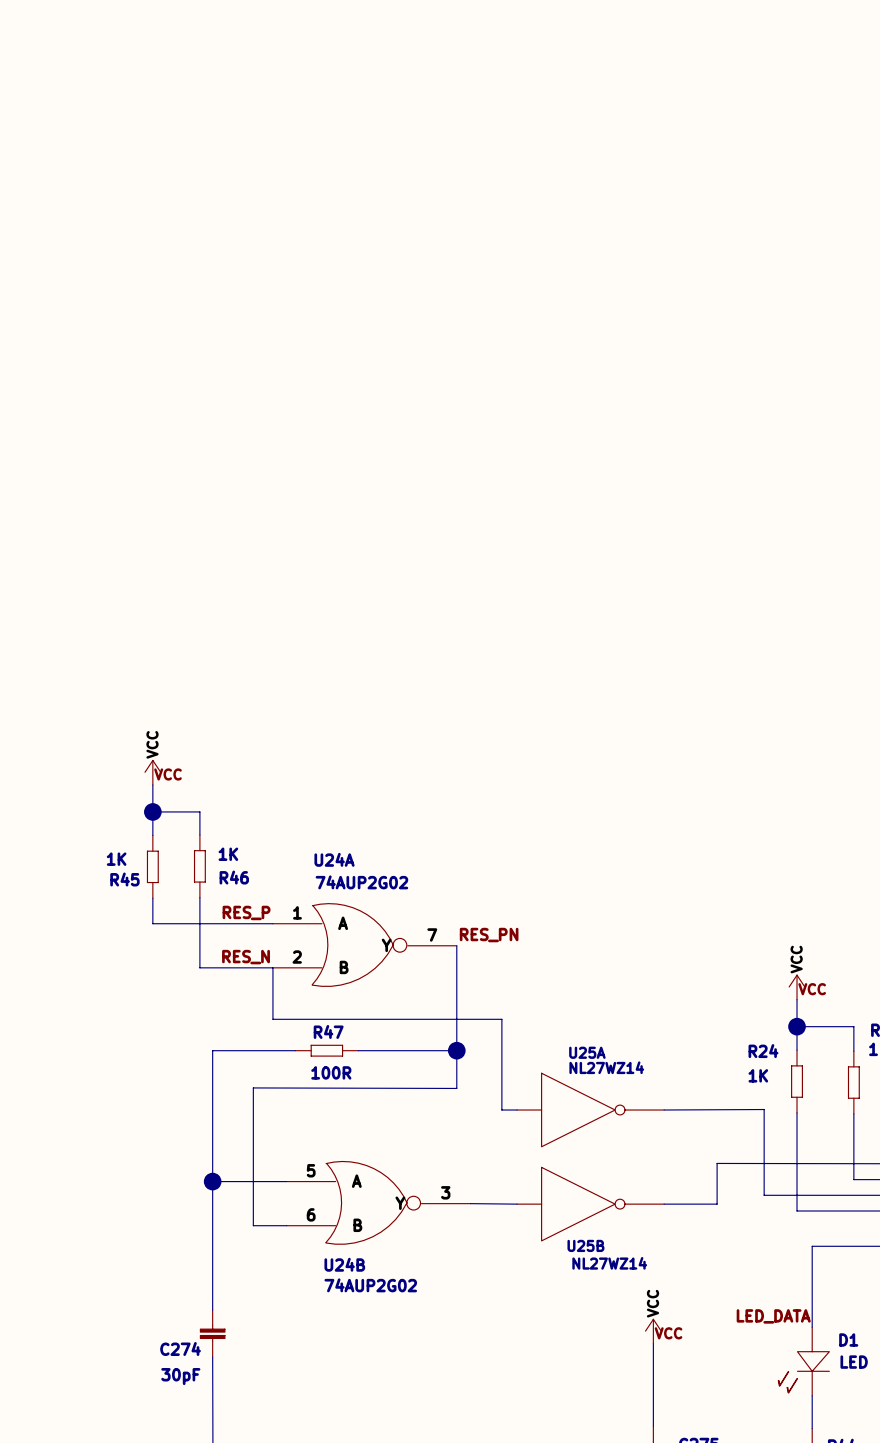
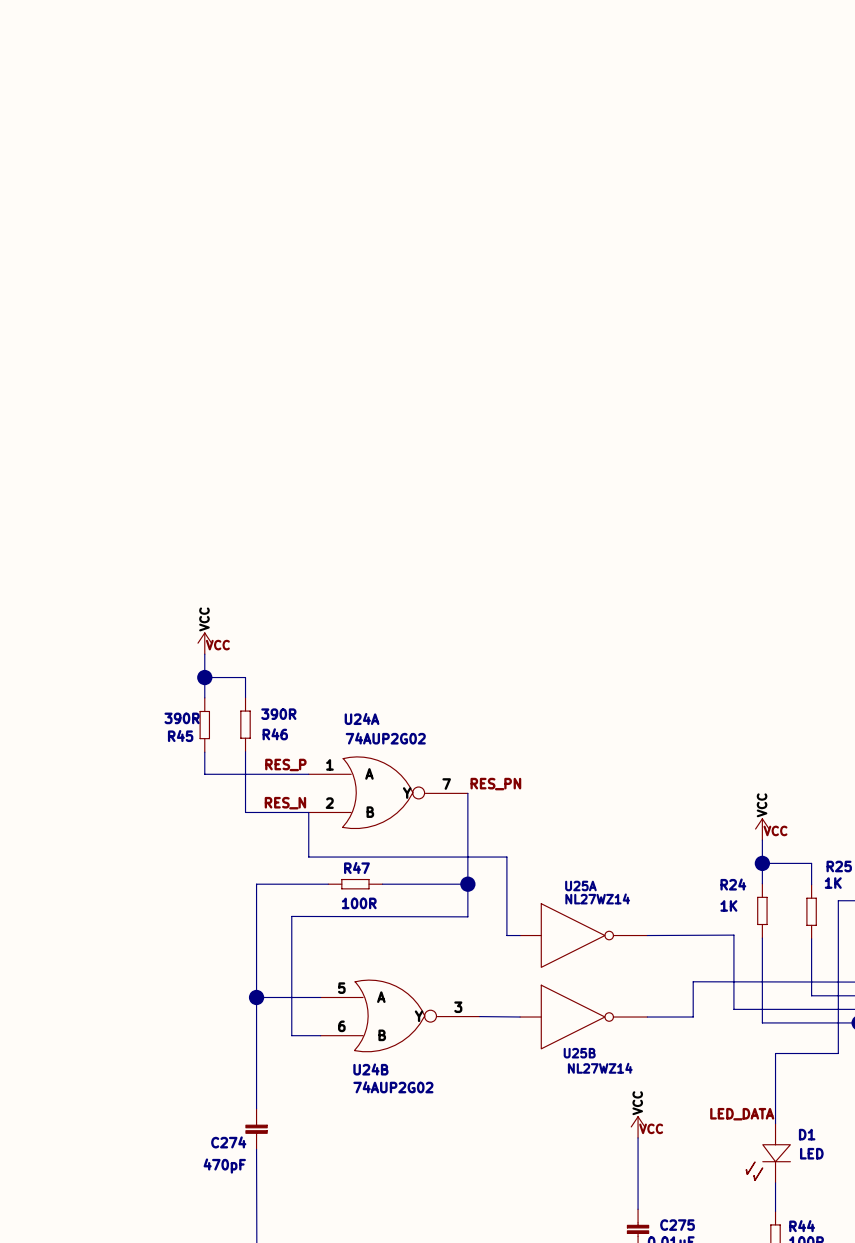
R46 value: 1K (228, 854) -> 390R (278, 714)
R45 value: 1K (116, 859) -> 390R (182, 718)
C274 value: 30pF (180, 1376) -> 470pF (224, 1166)

